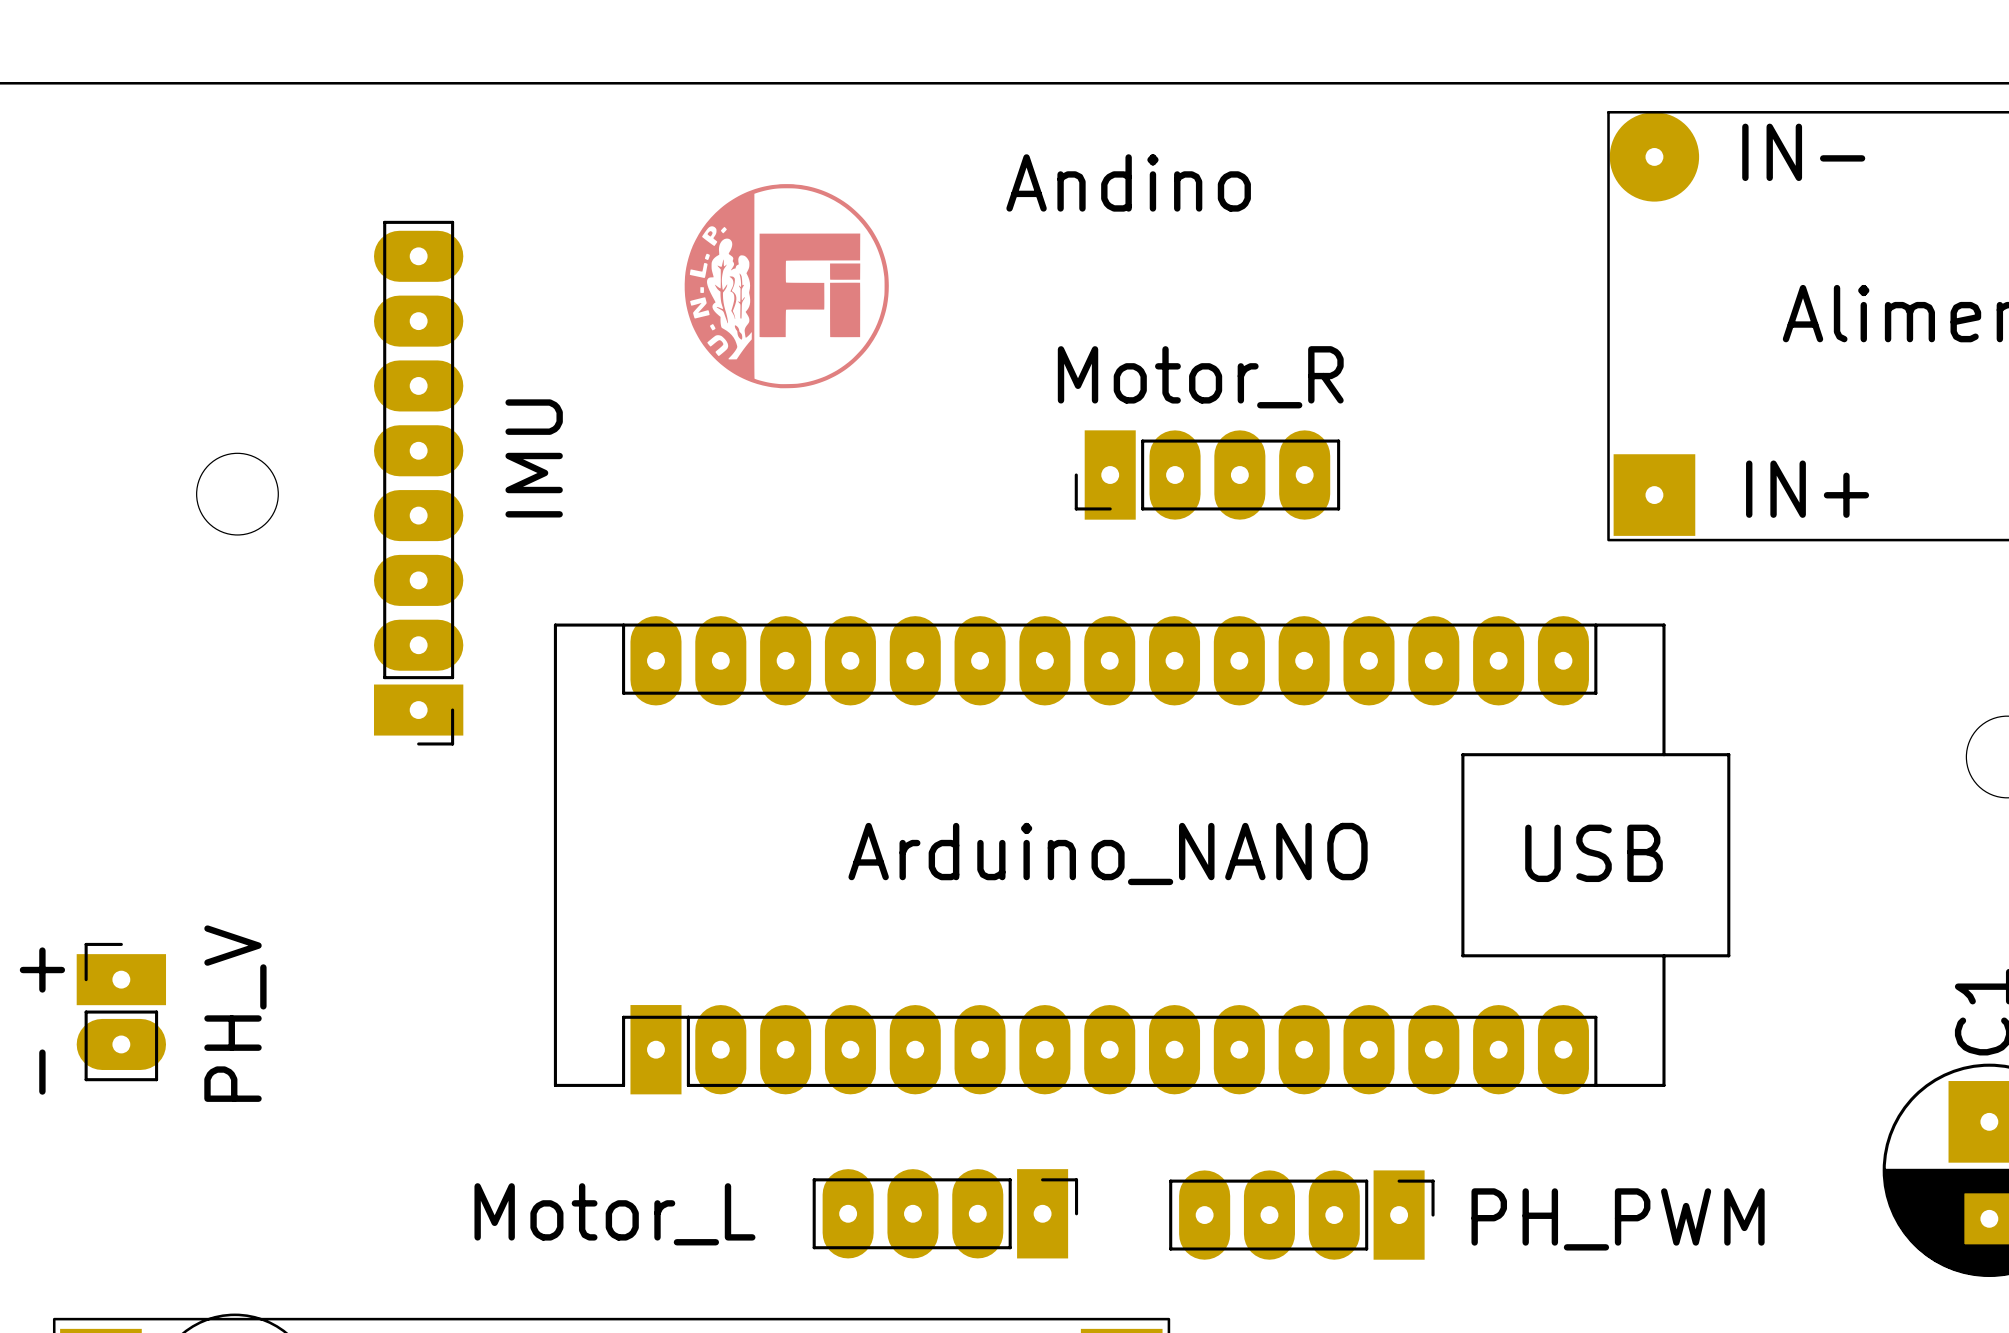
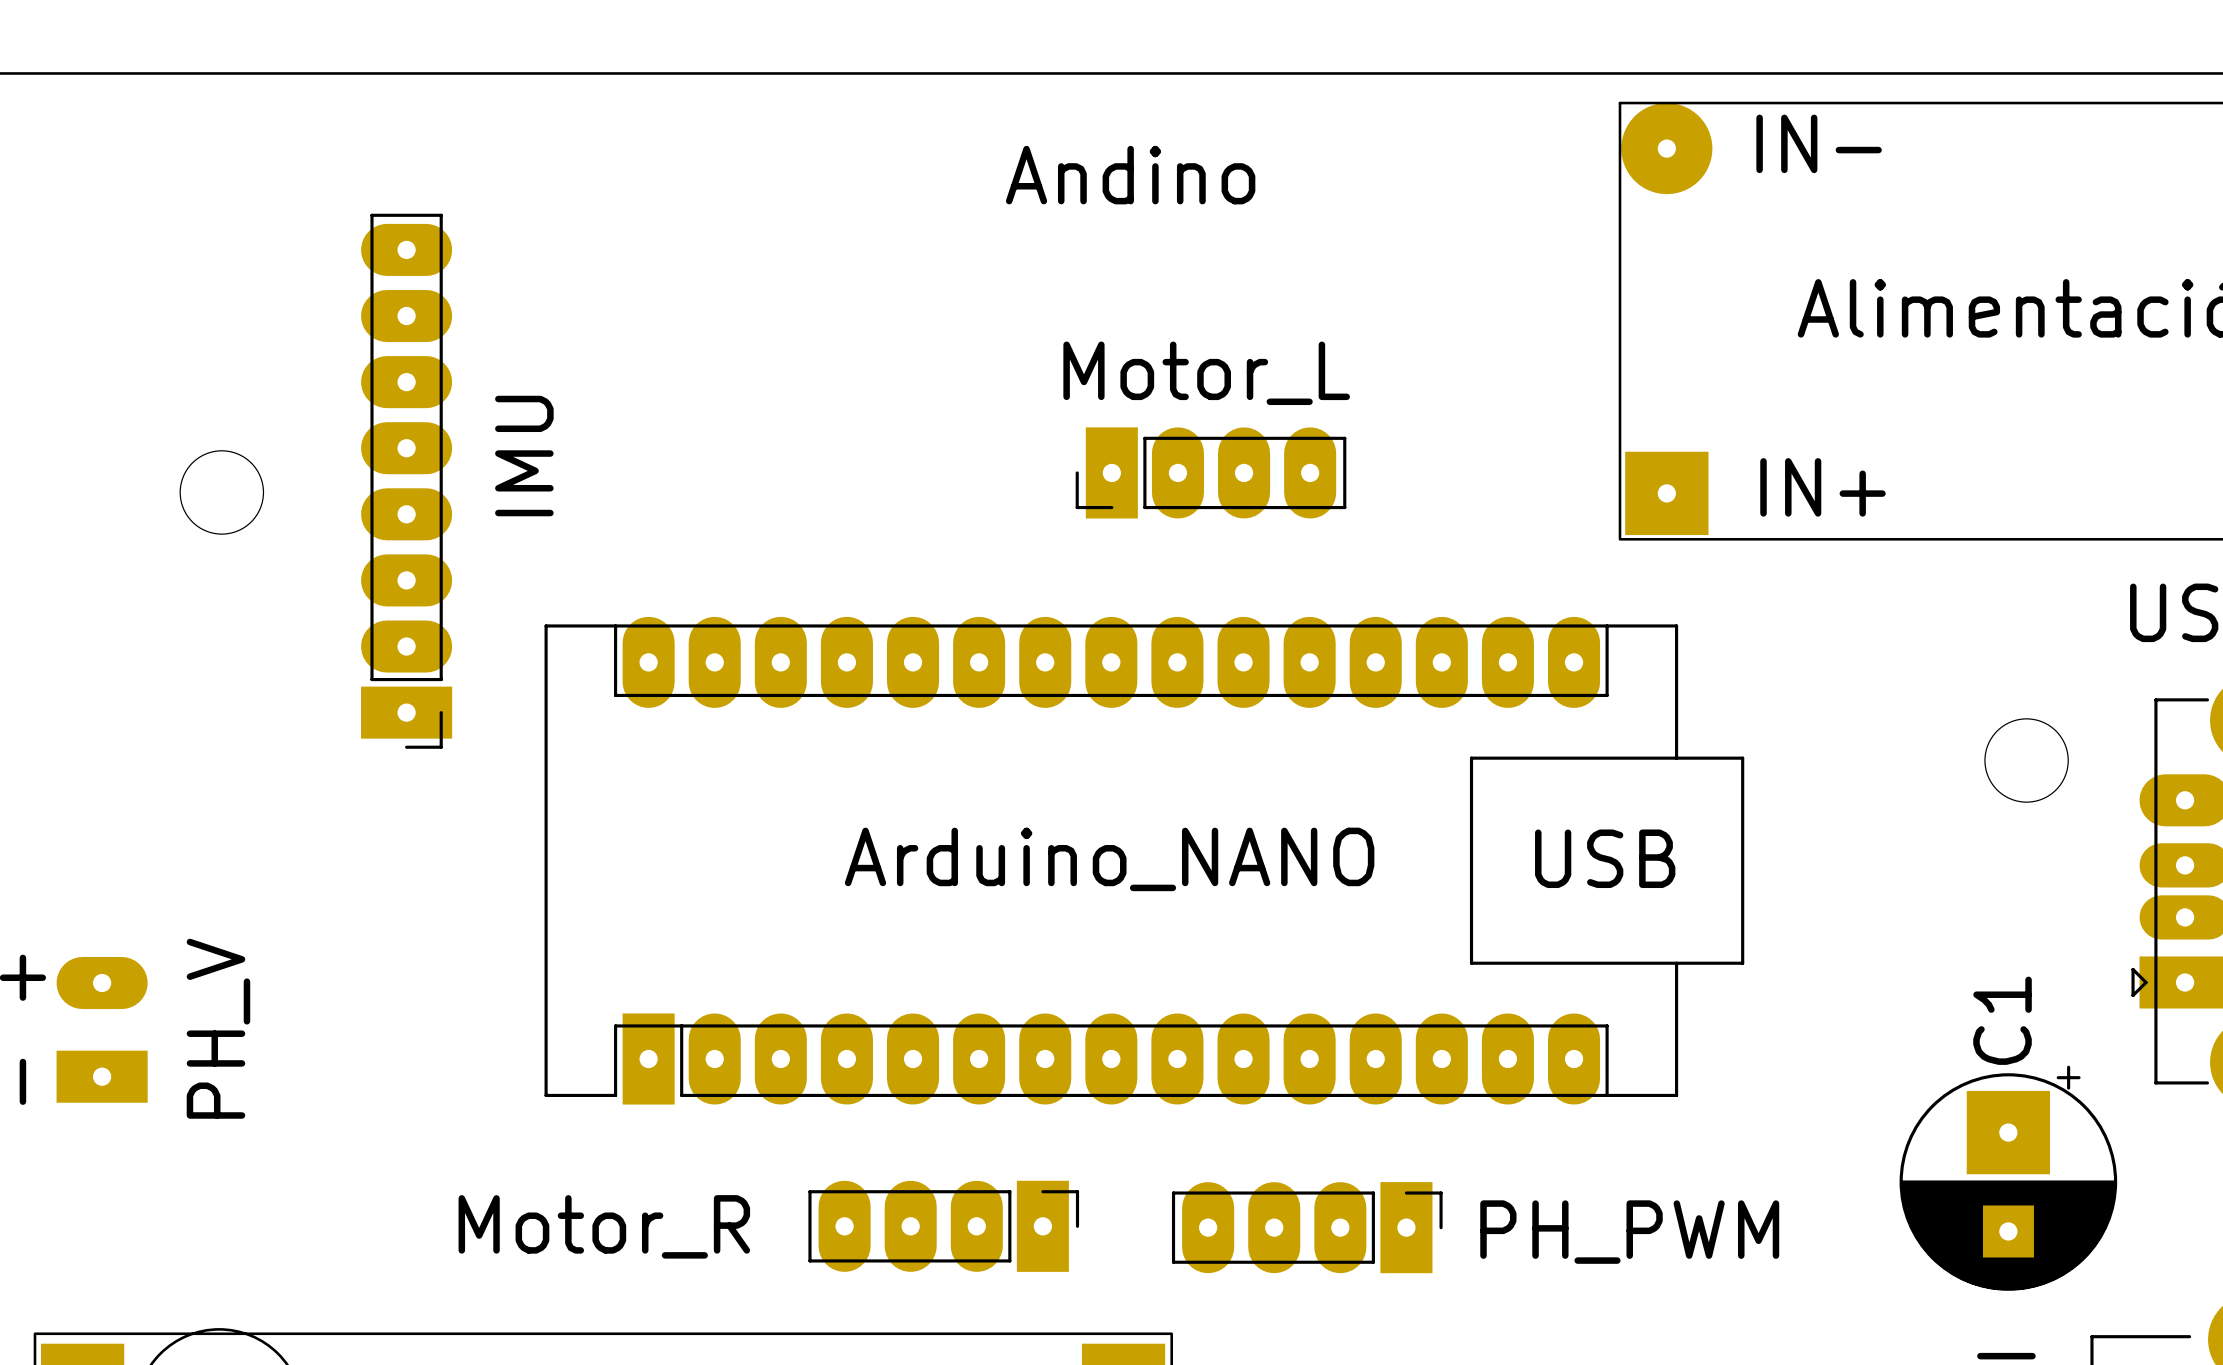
drawing: [684, 184, 889, 389] -> none
Motor_R name: Motor_R (1200, 377) -> Motor_L (1206, 373)
PH_V footprint: [76, 942, 167, 1082] -> [56, 956, 148, 1103]
Motor_L name: Motor_L (614, 1214) -> Motor_R (604, 1226)

